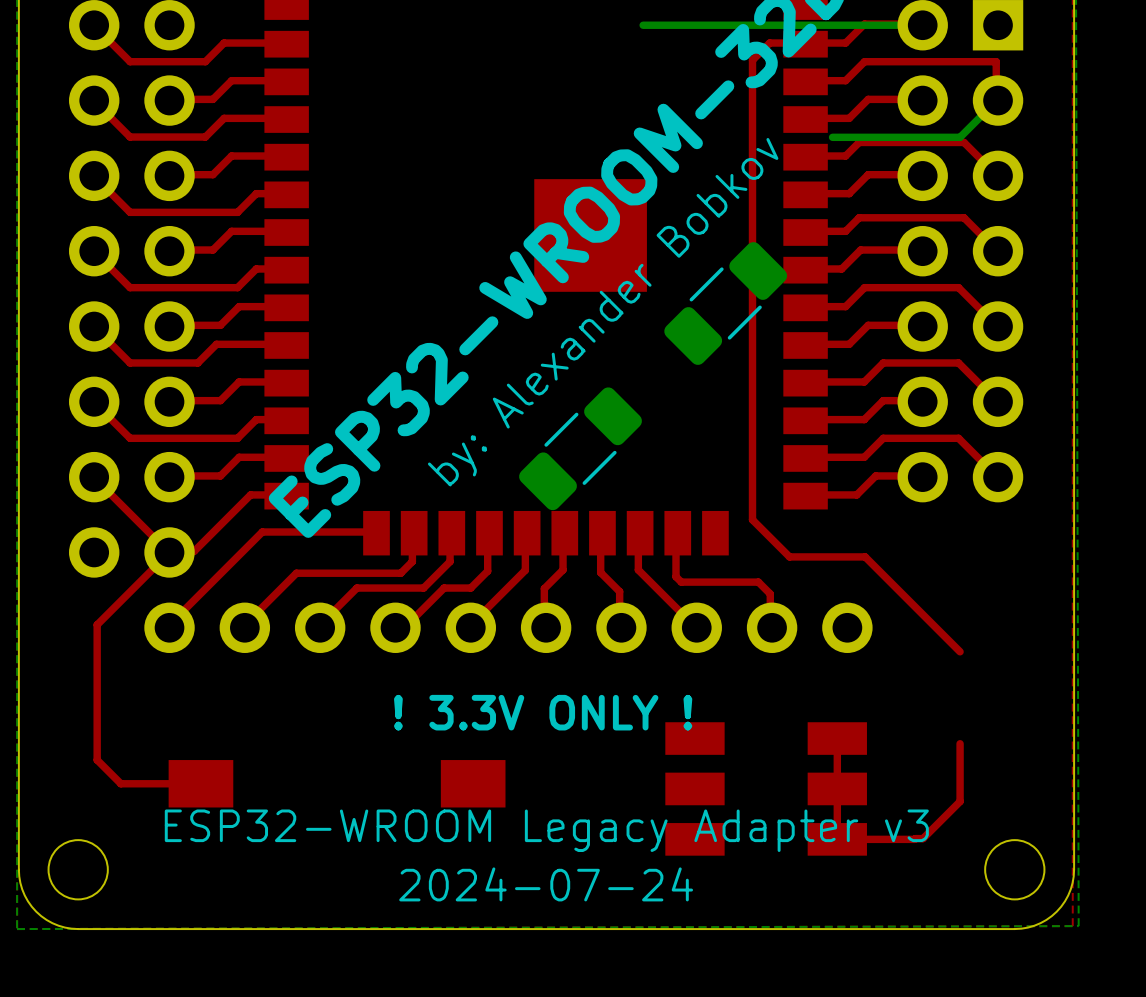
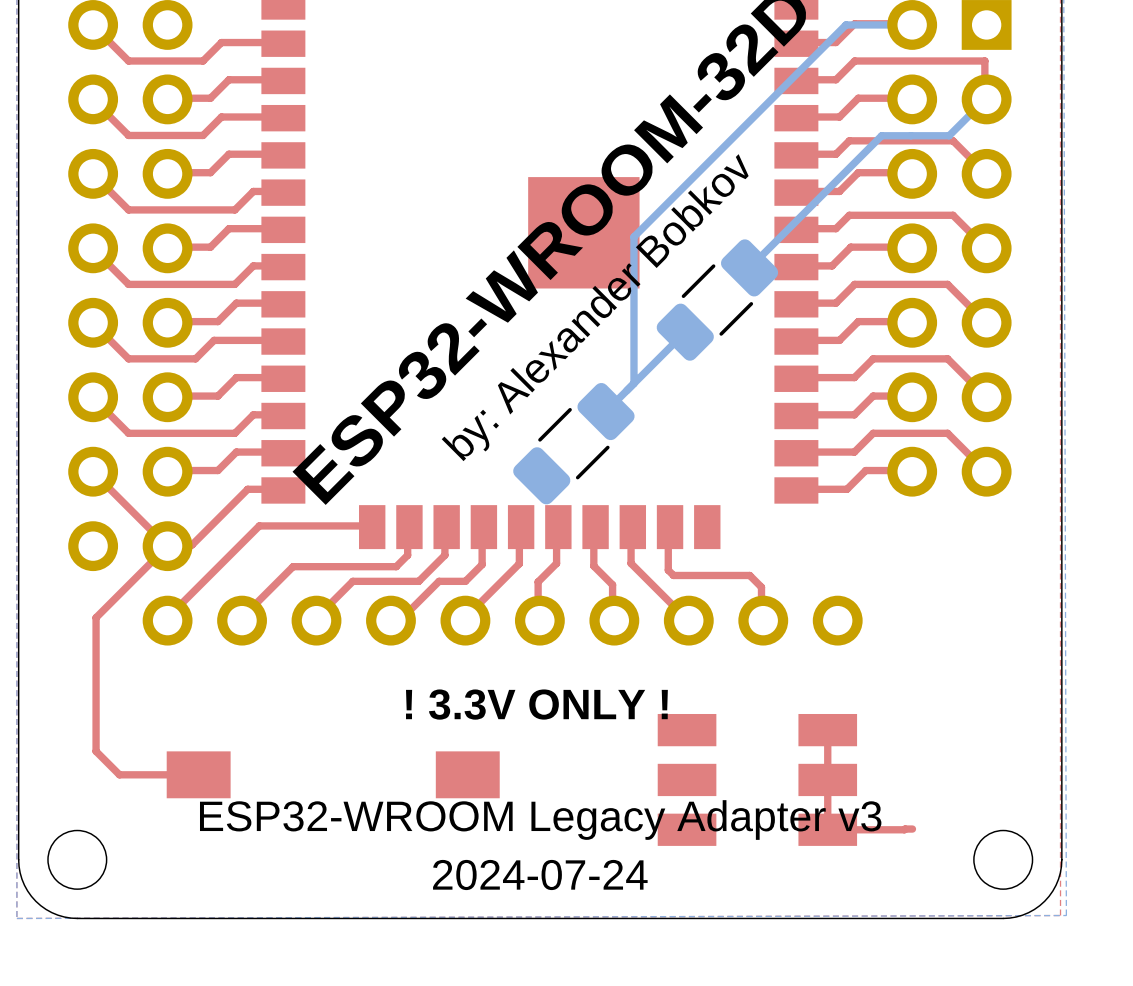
bottom track: (855, 25) (643, 25) -> (845, 24) (633, 236) (633, 383)
top track: (803, 43) (769, 43) (752, 60) (752, 519) (789, 556) (865, 556) (960, 651) -> none
bottom track: (891, 137) (832, 137) -> (881, 135) (749, 267)
bottom track: none -> (685, 332) (606, 411)
top track: (960, 743) (960, 801) (923, 838) -> none

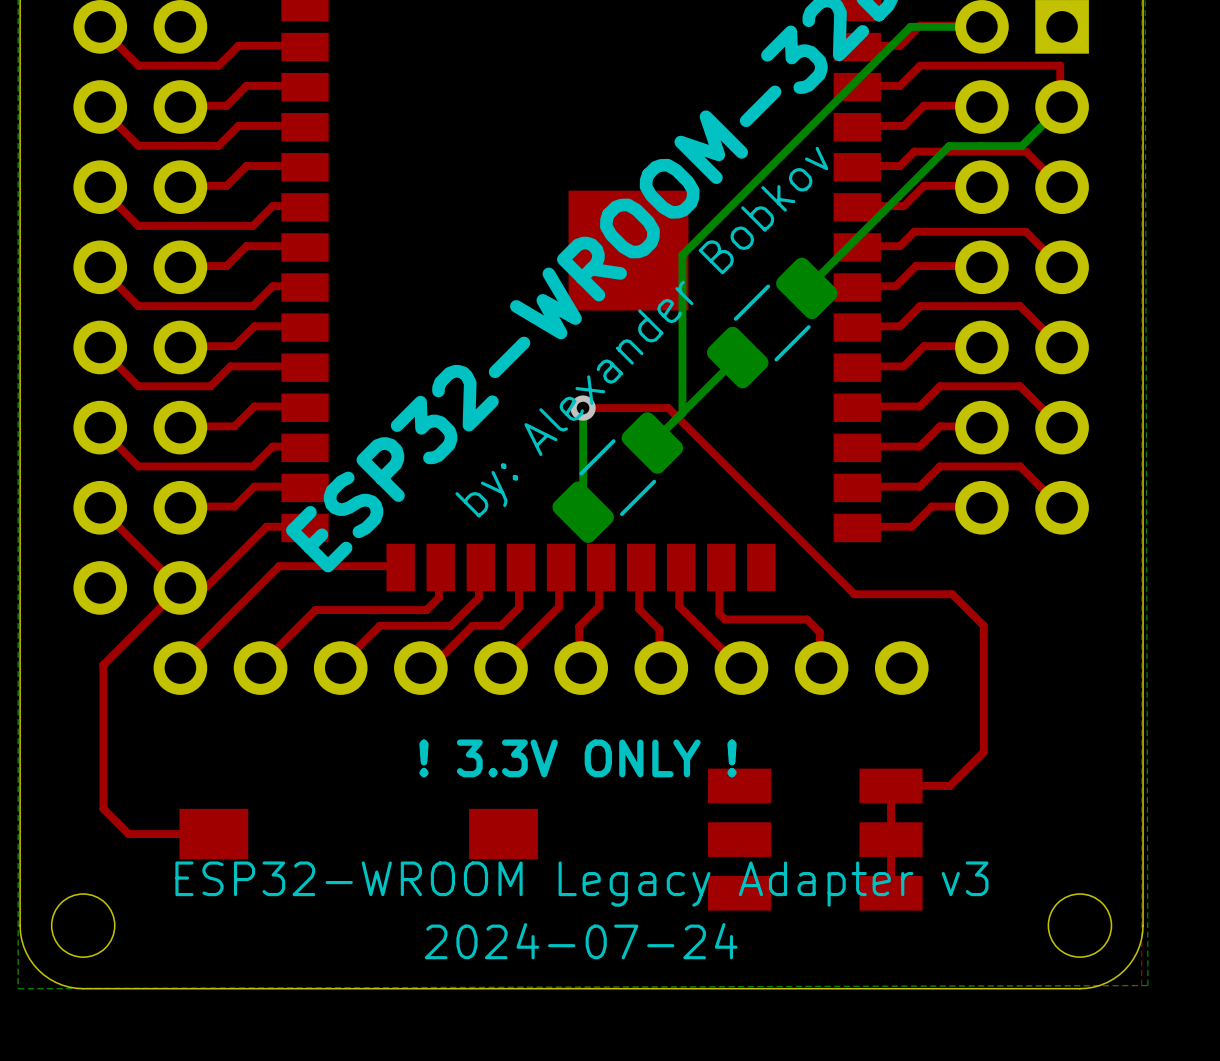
top track: none -> (583, 408) (668, 408) (854, 594) (952, 594) (983, 625) (983, 752) (949, 785) (891, 785)
bottom track: none -> (583, 408) (583, 512)
via: none -> (583, 408)
top track: (912, 829) (827, 829) -> none

